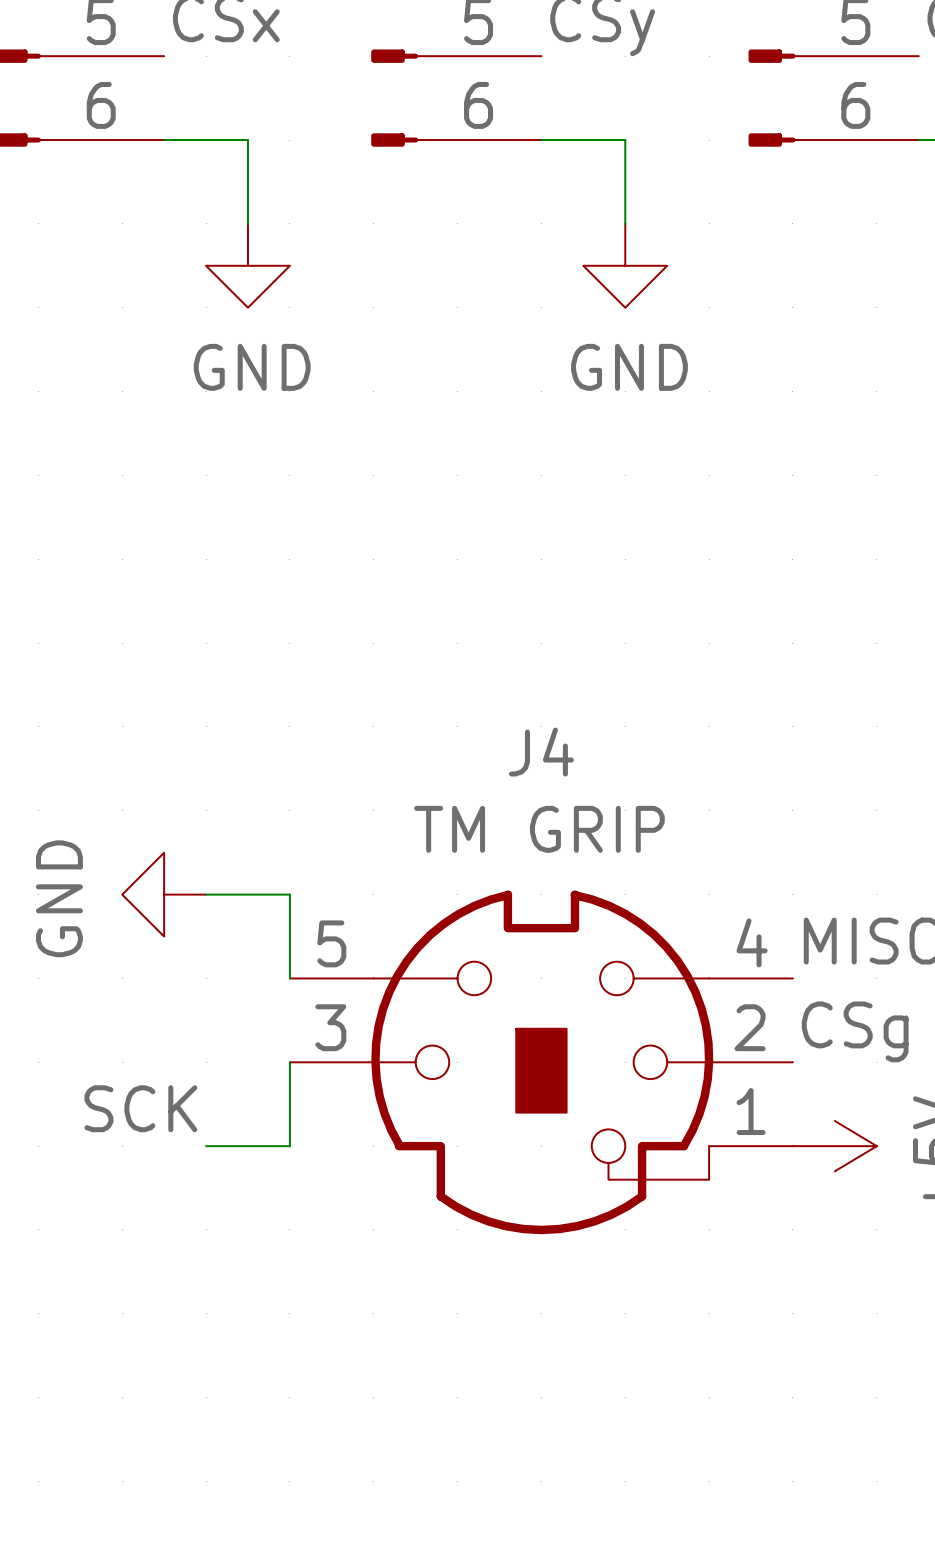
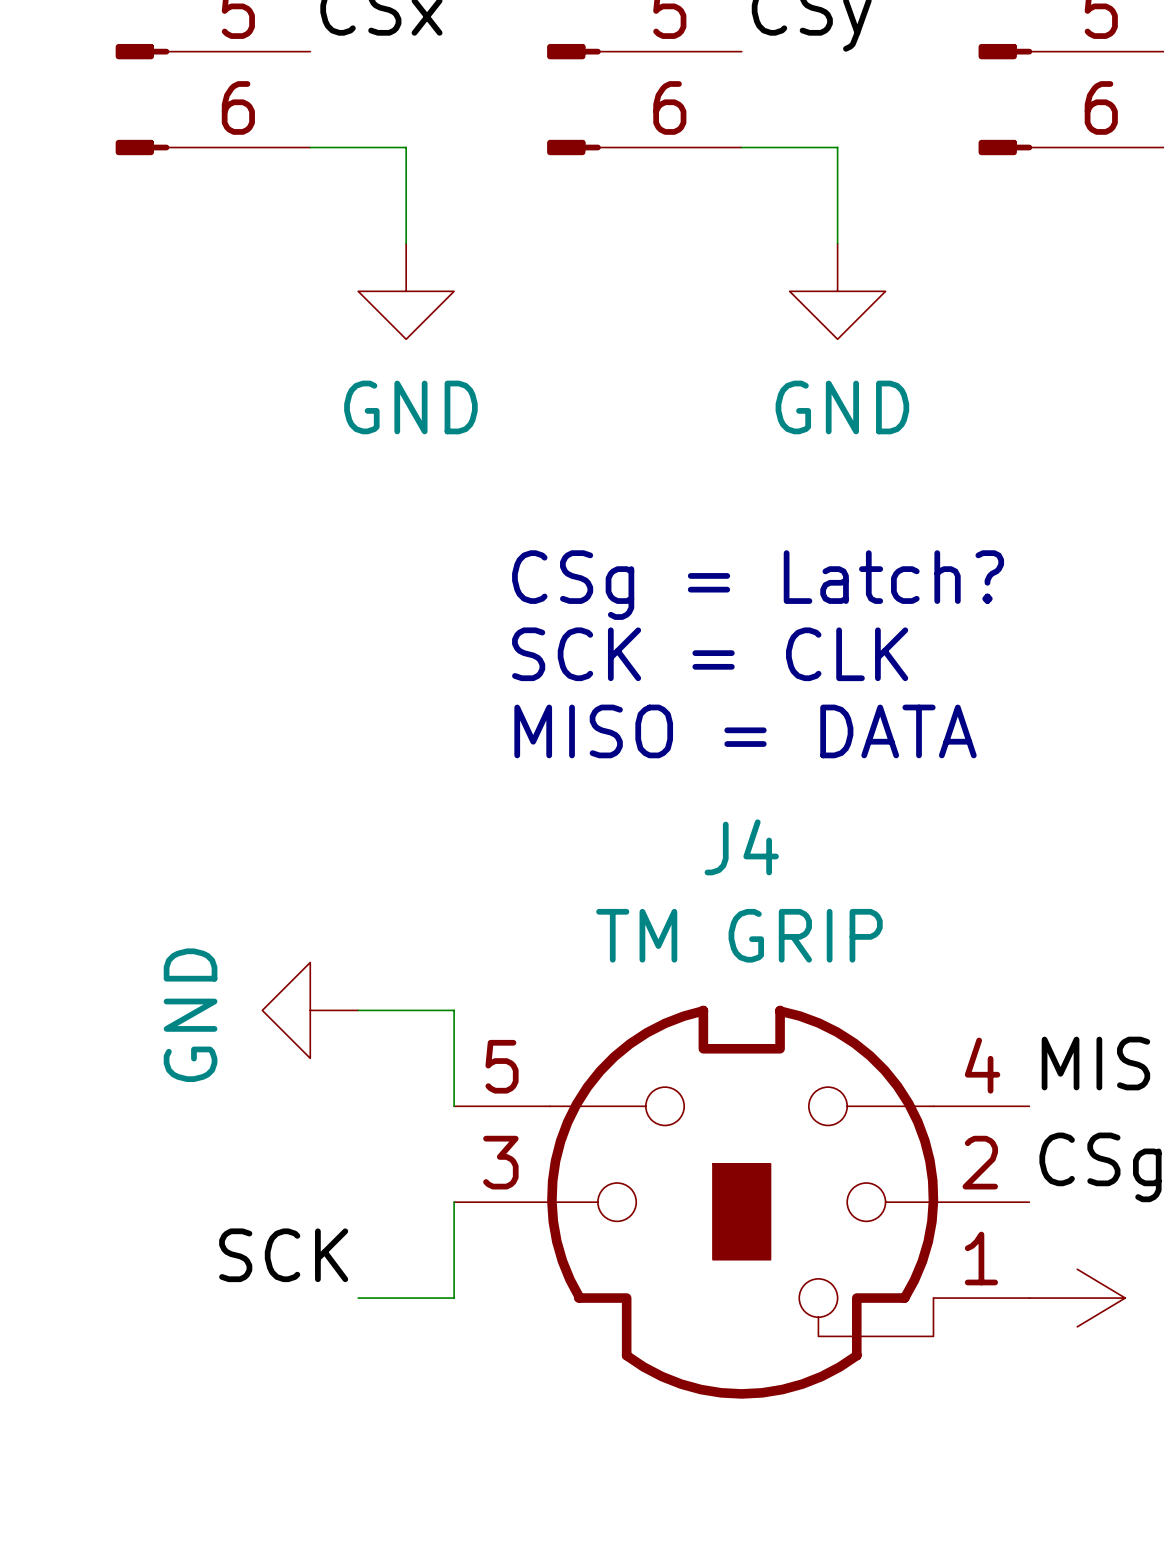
text: none -> CSg = Latch? (758, 585)
text: none -> SCK = CLK (710, 654)
text: none -> MISO = DATA (745, 731)

